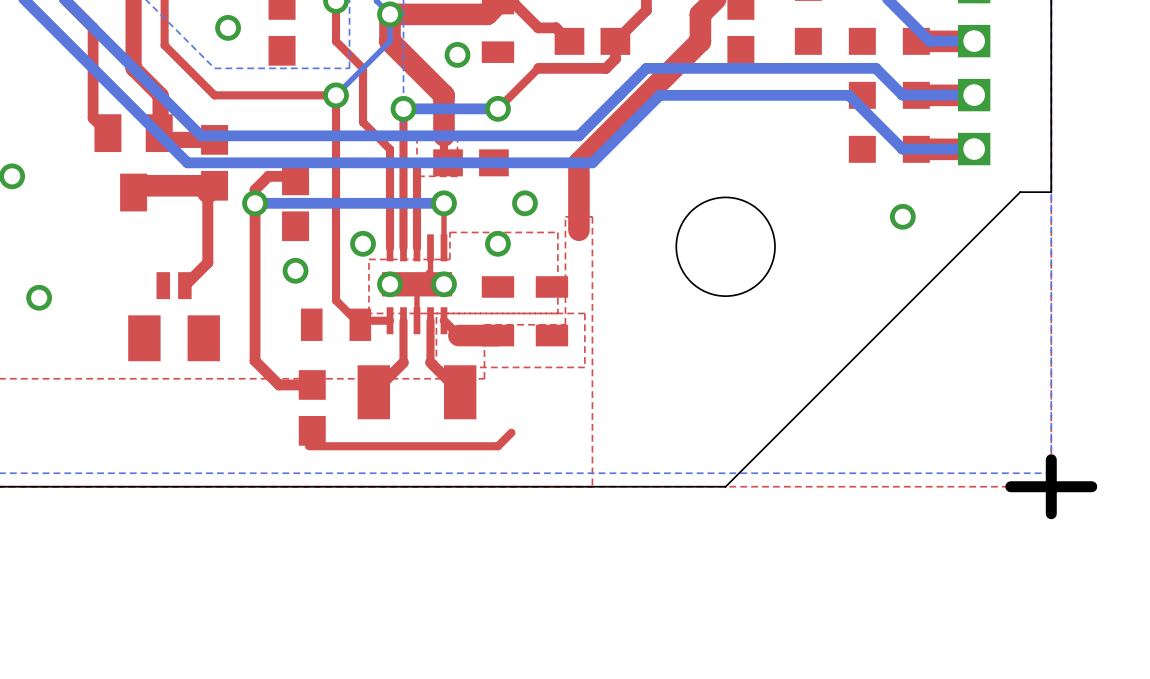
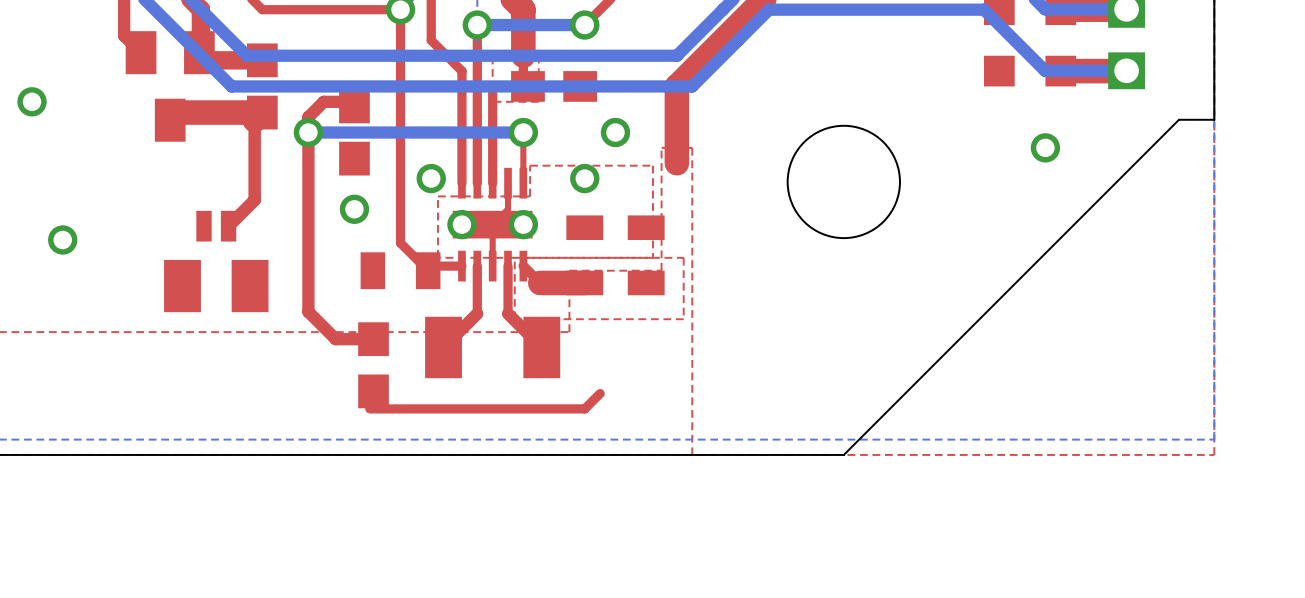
board edge: (1051, 459) (1051, 513) -> none
board edge: (1091, 486) (1010, 486) -> none

